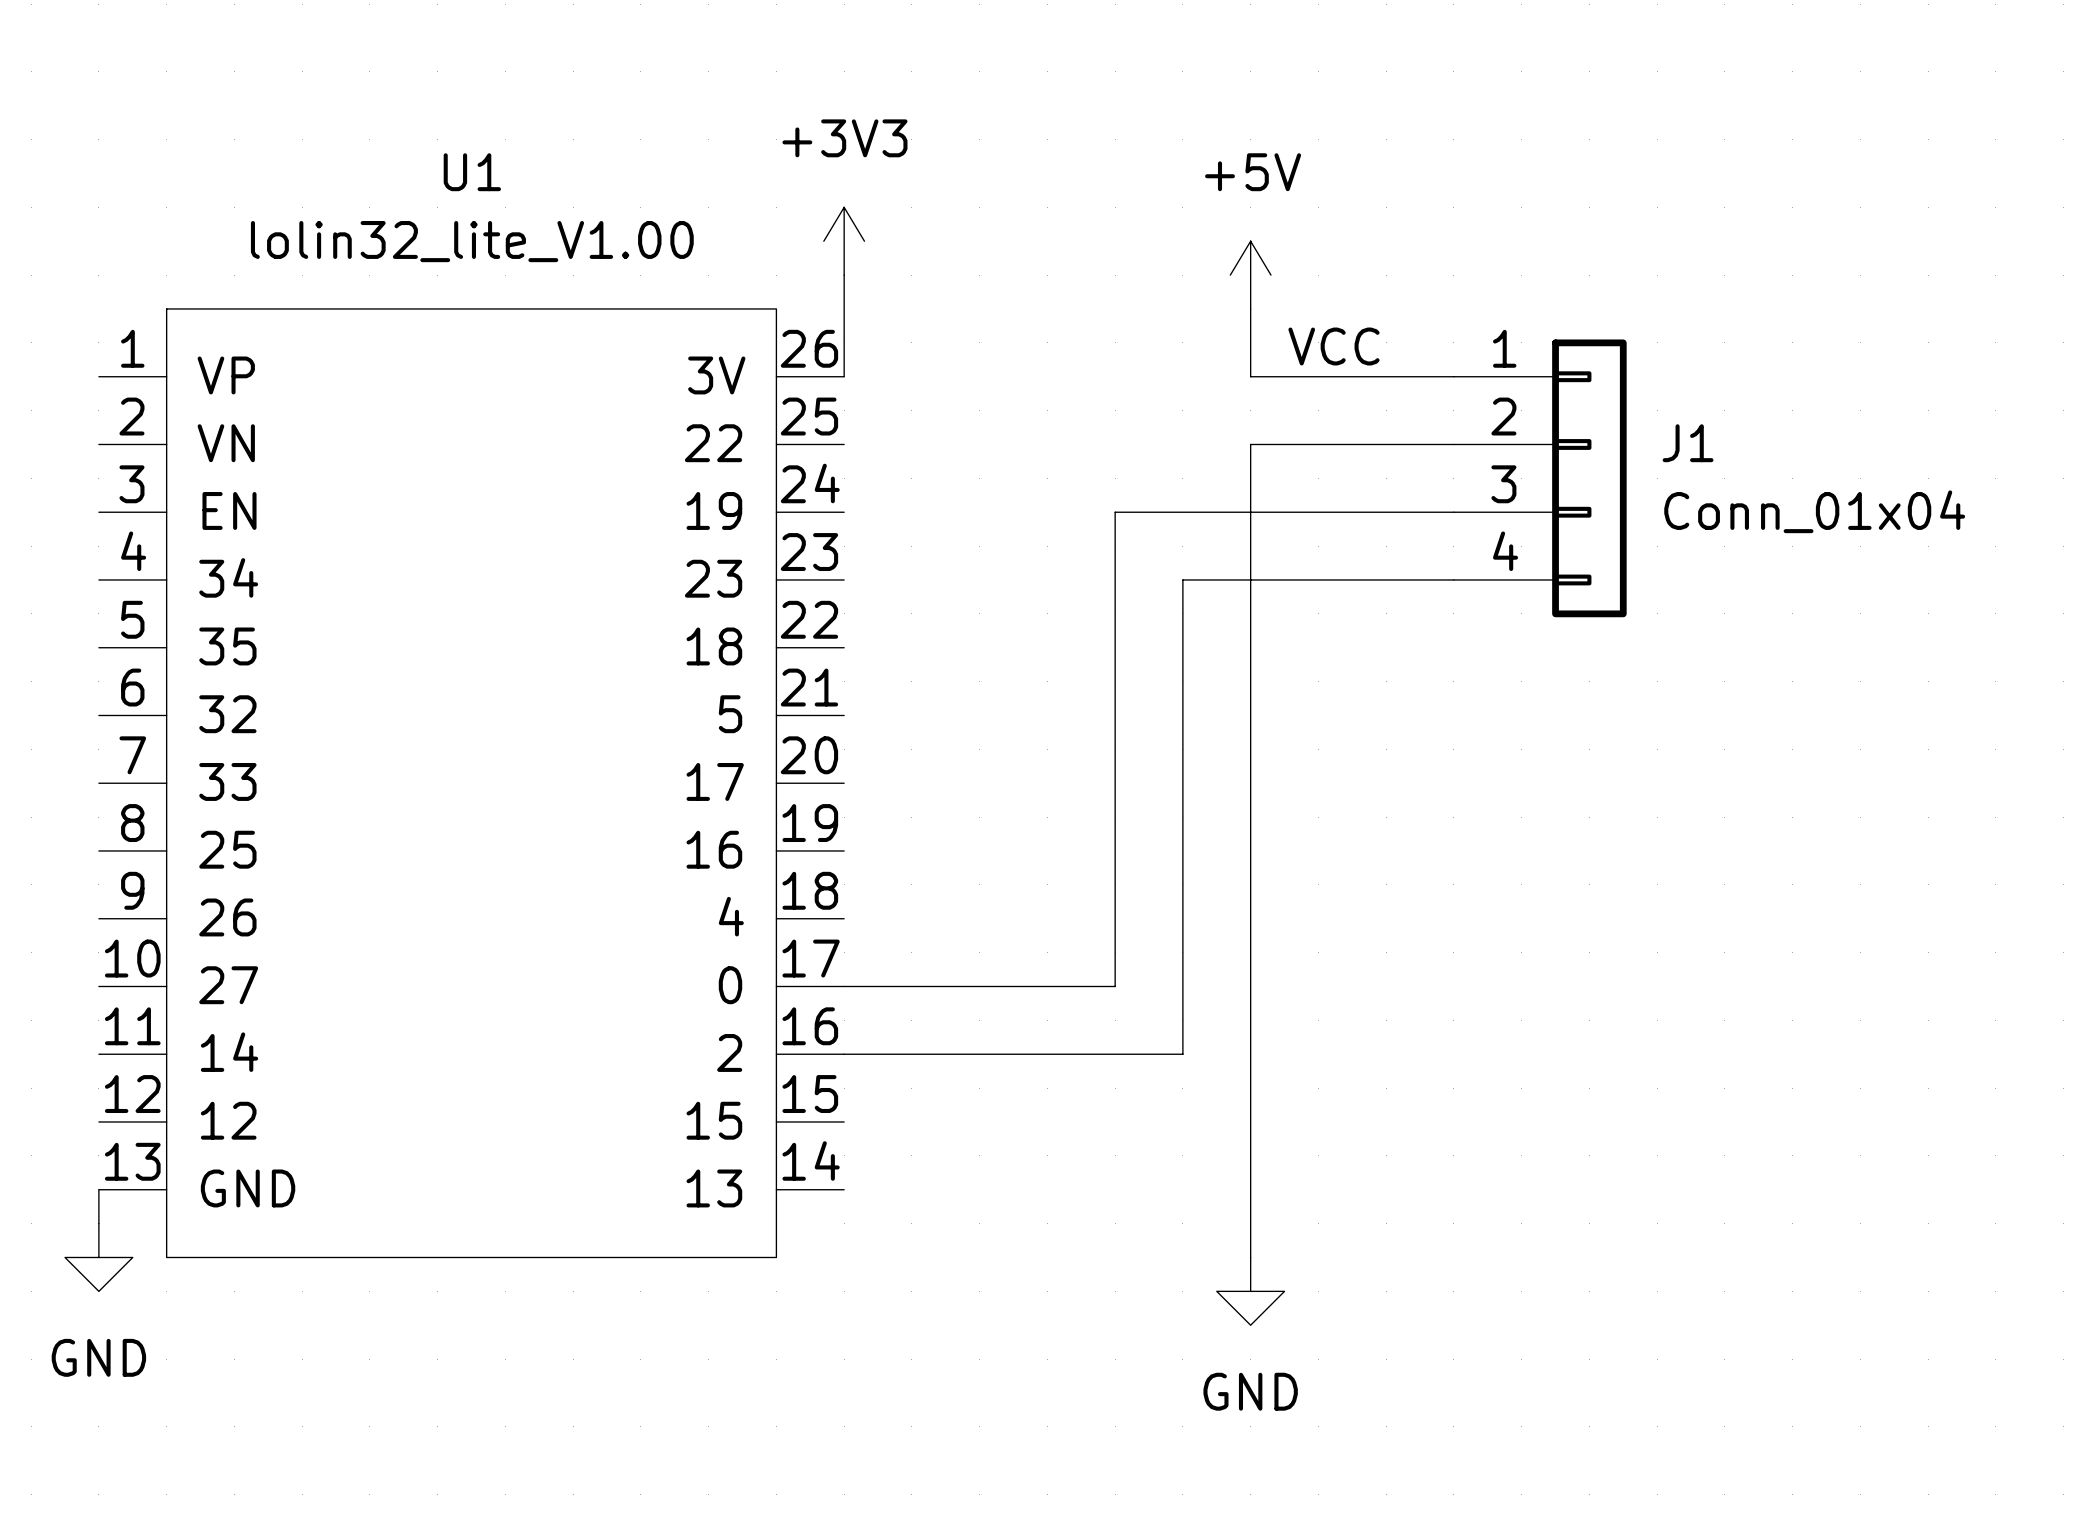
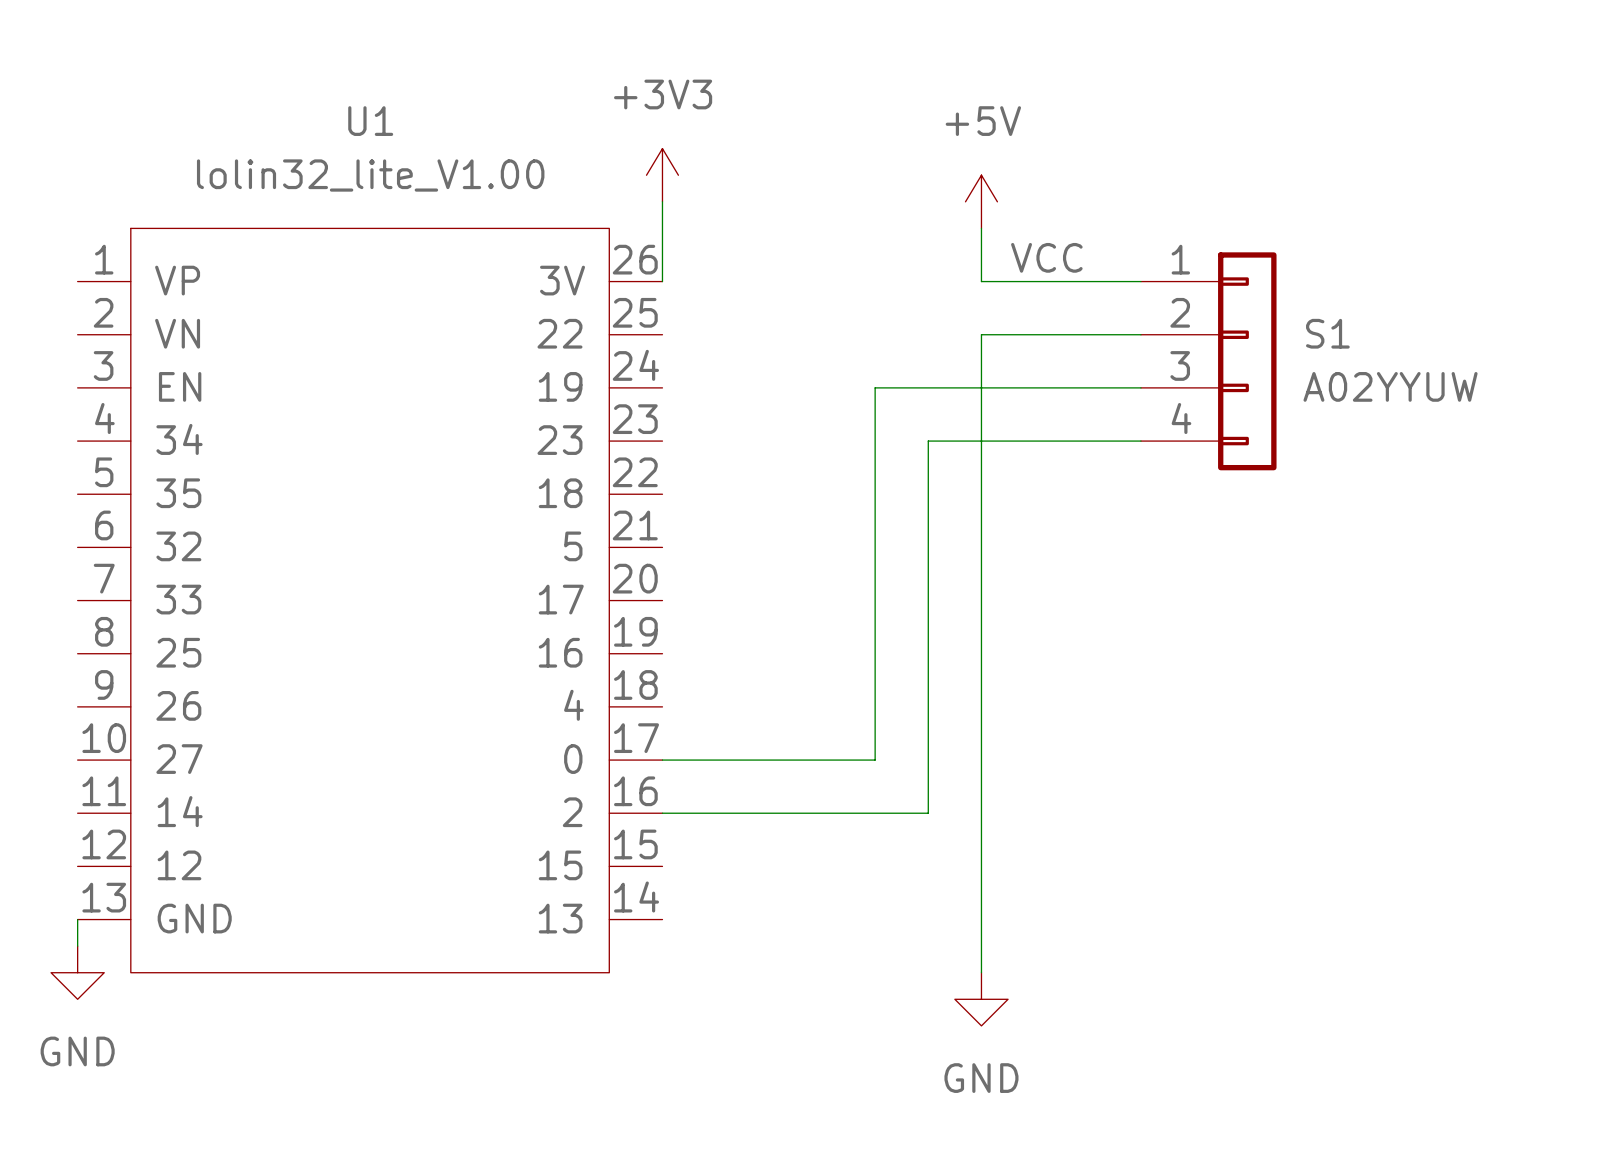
J1 name: J1 (1688, 443) -> S1 (1327, 333)
J1 value: Conn_01x04 (1814, 511) -> A02YYUW (1390, 386)

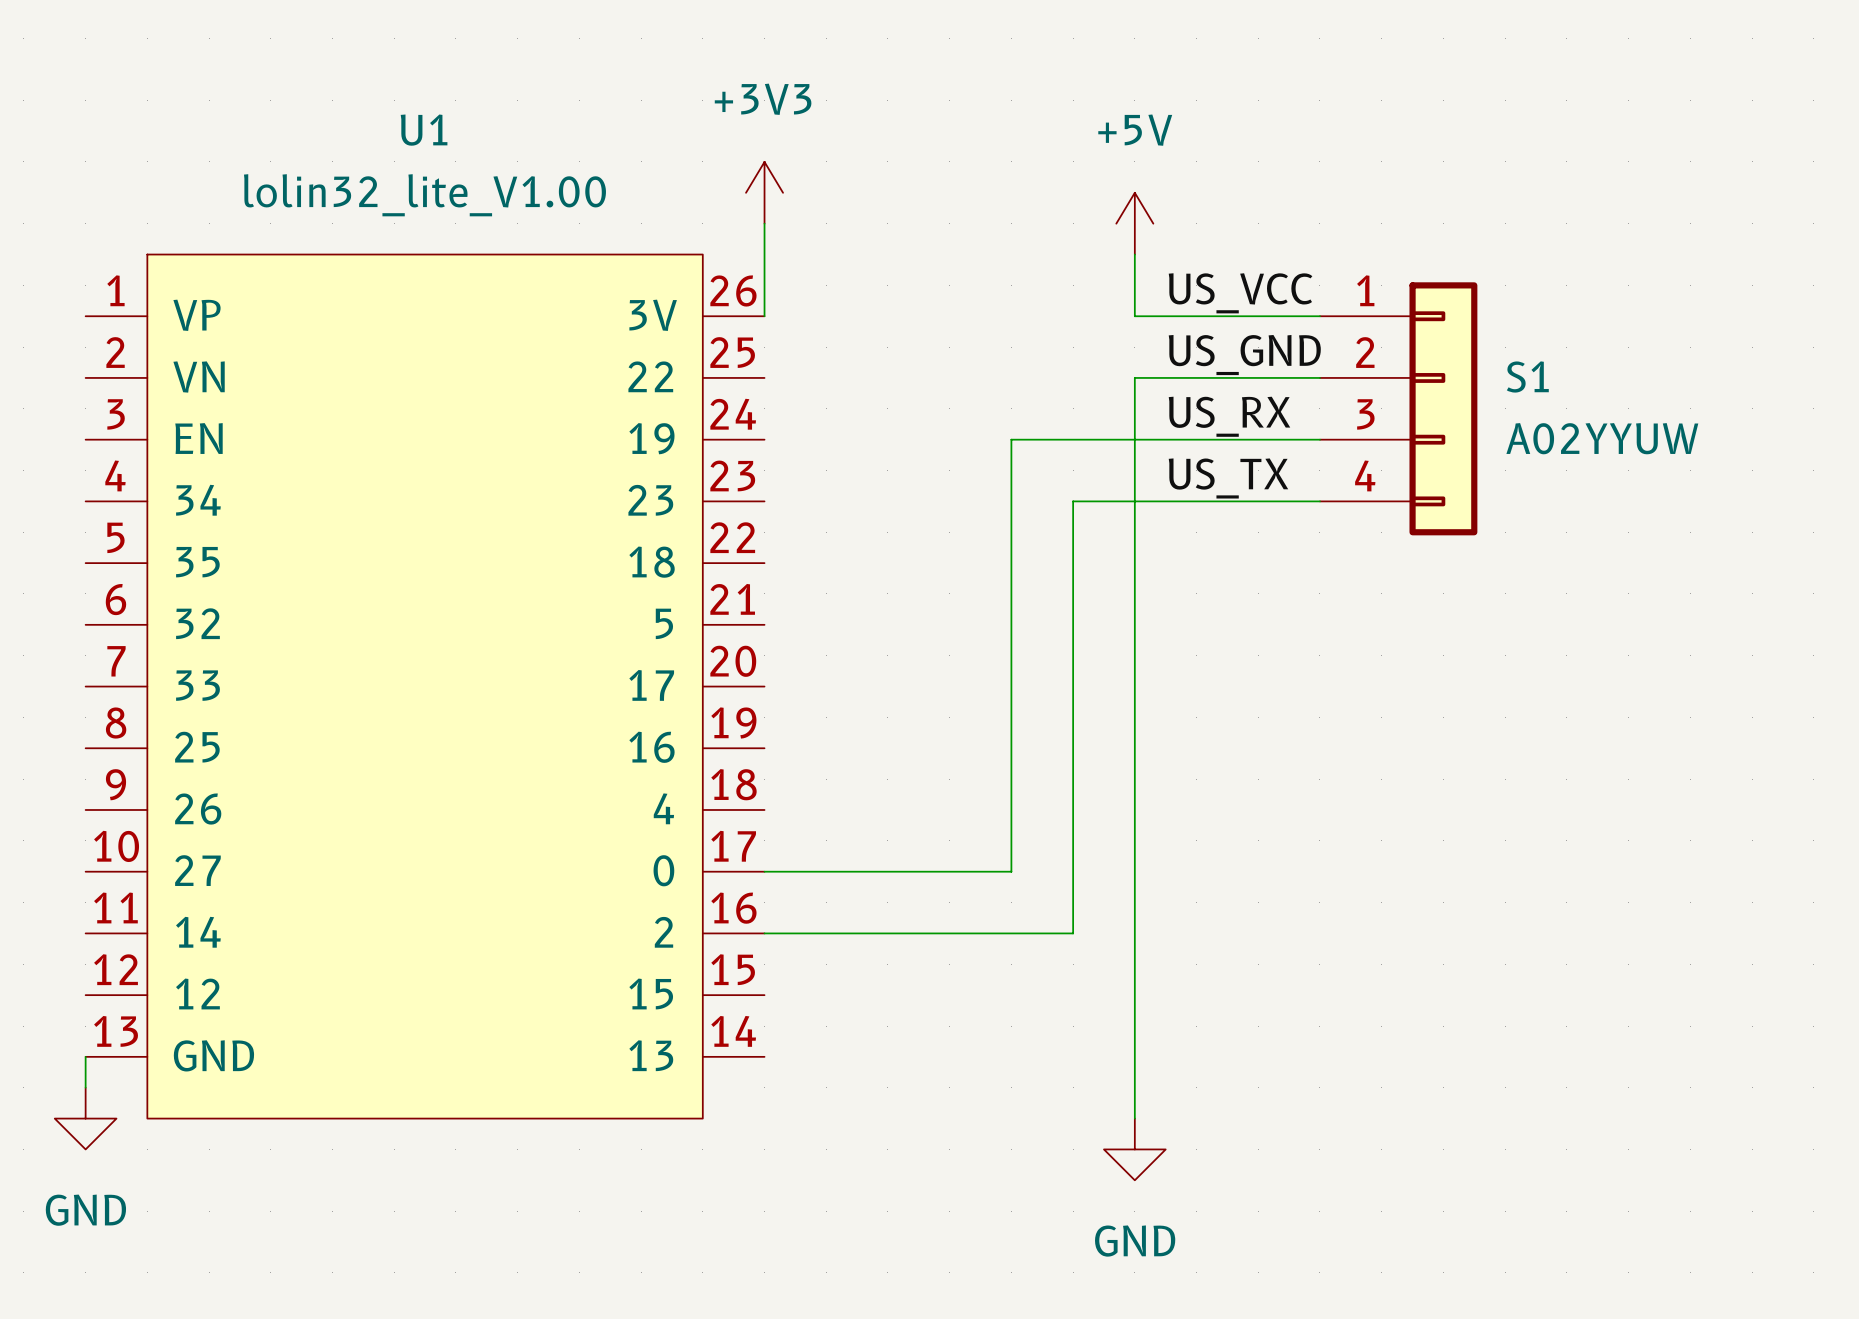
label: VCC (1046, 257) -> US_VCC (1240, 293)
label: none -> US_GND (1244, 355)
label: none -> US_RX (1229, 416)
label: none -> US_TX (1228, 478)

